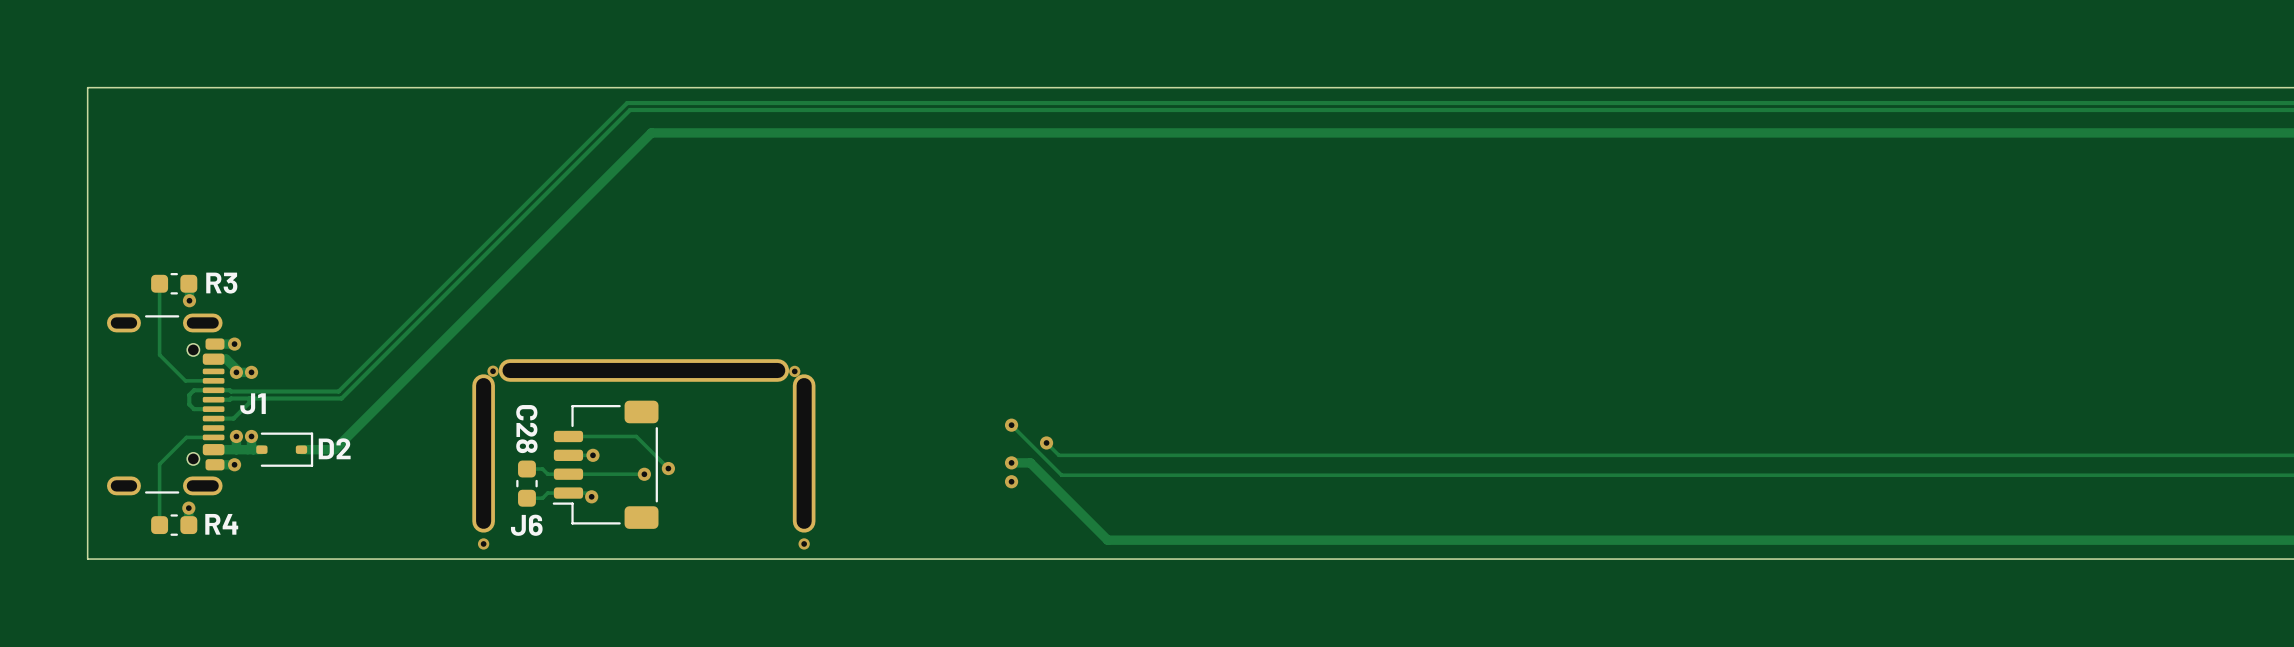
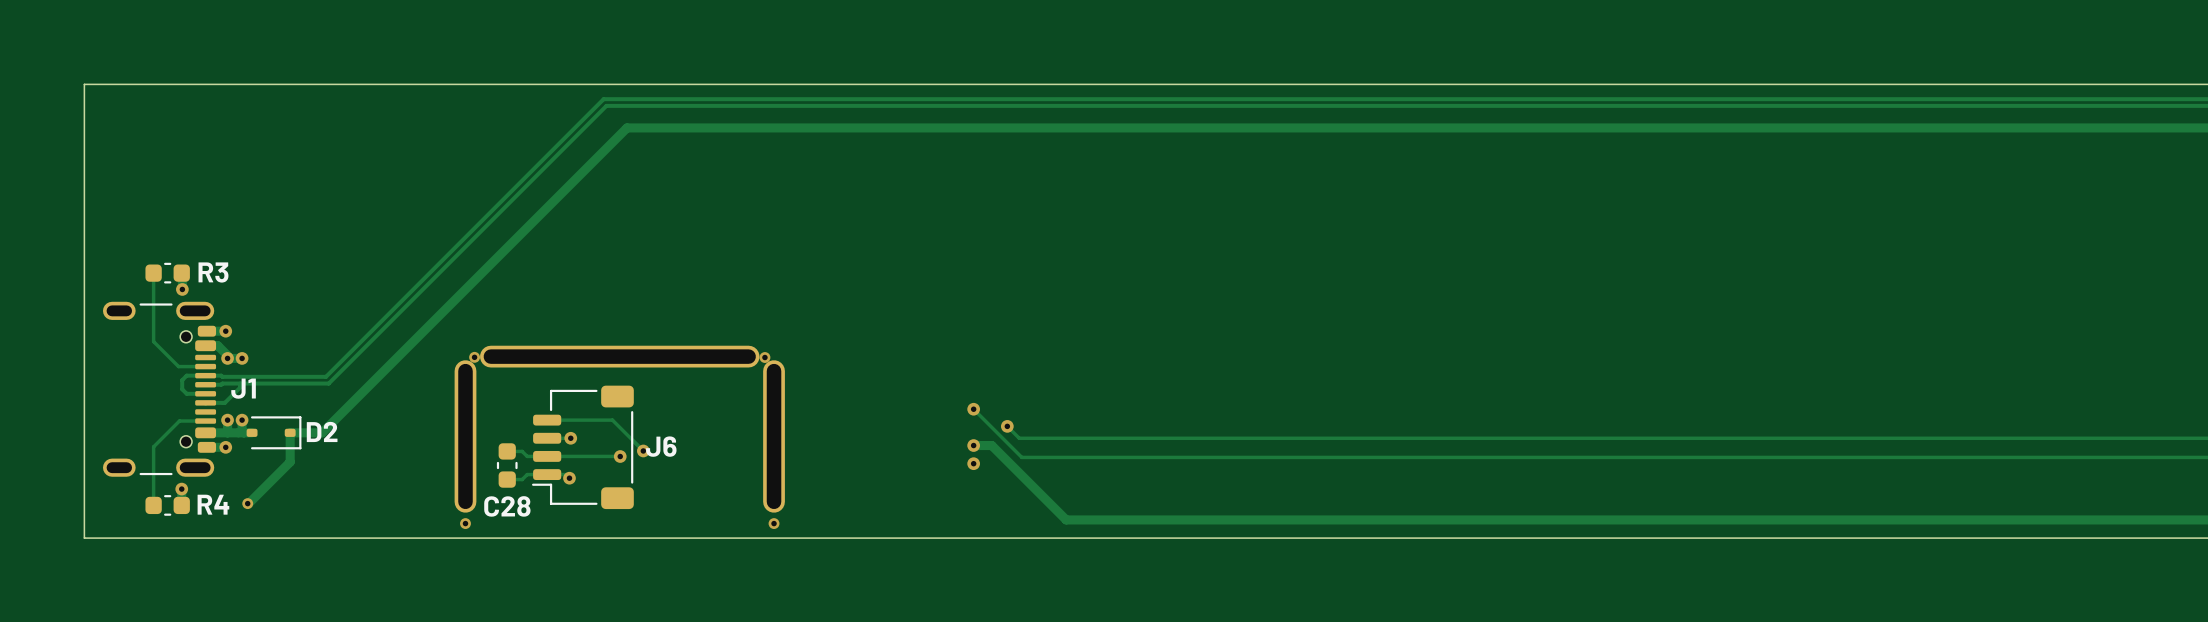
C28 name rotation: 0° (526, 429) -> 90° counterclockwise (507, 506)
C28 name position: C28 (526, 429) -> C28 (507, 506)
track: none -> (290, 432) (290, 462) (247, 503)
via: none -> (247, 503)
J6 name position: J6 (526, 525) -> J6 (661, 446)

